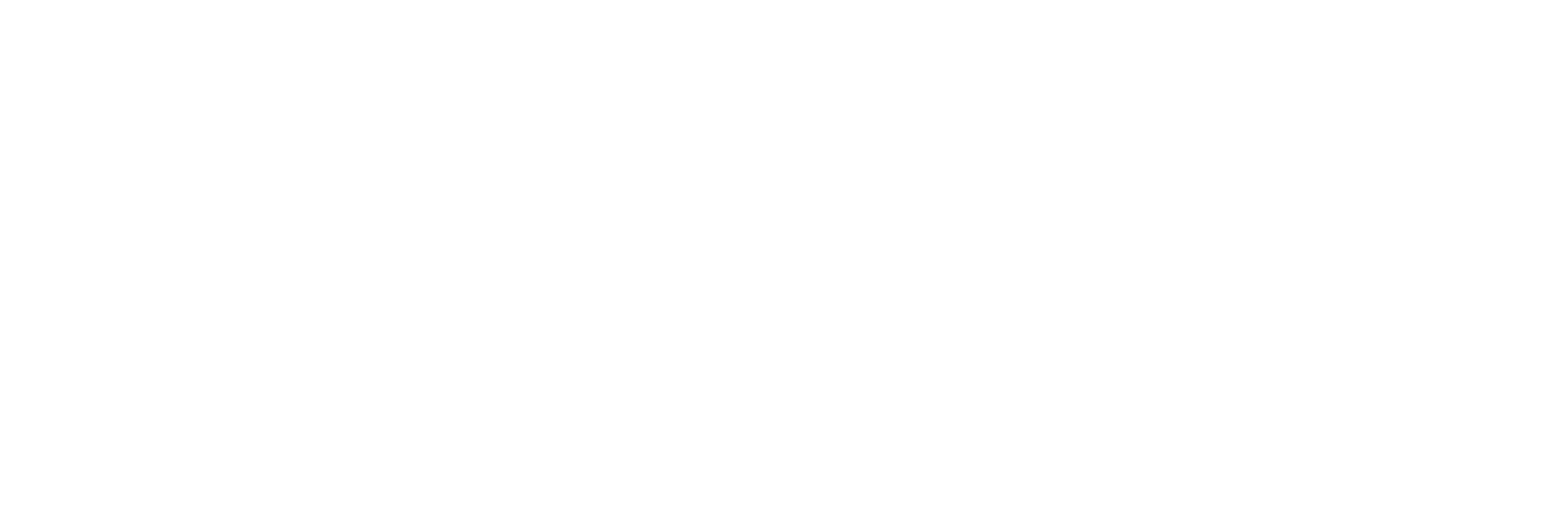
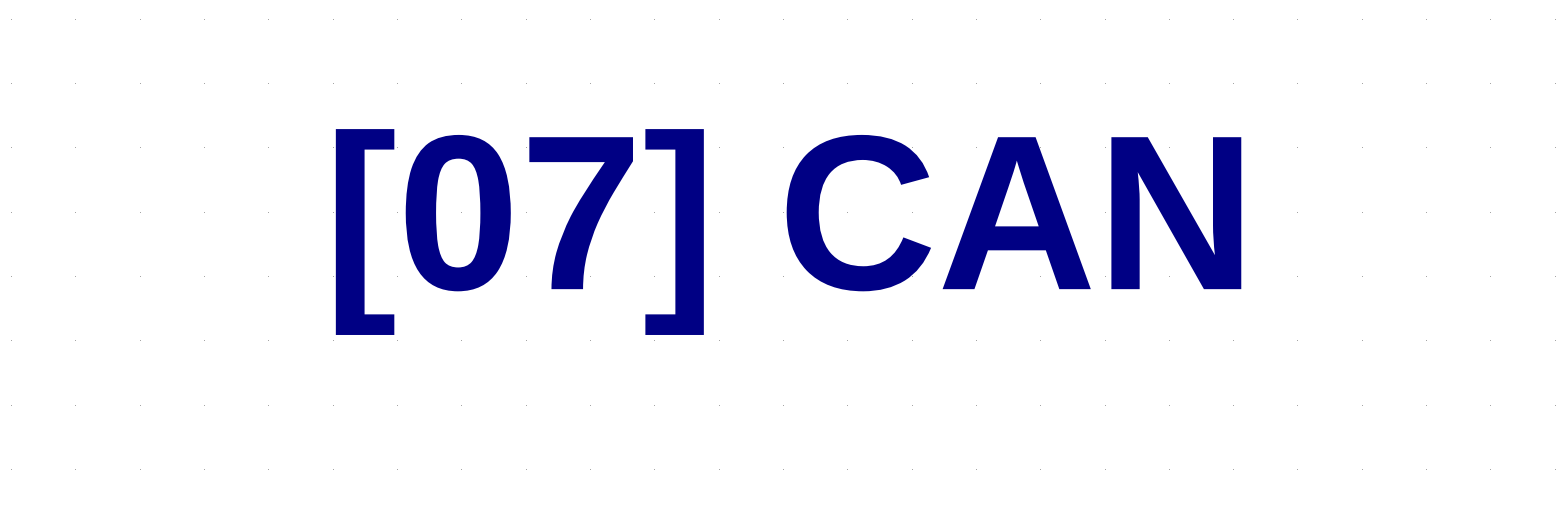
text: none -> [07] CAN (788, 232)

